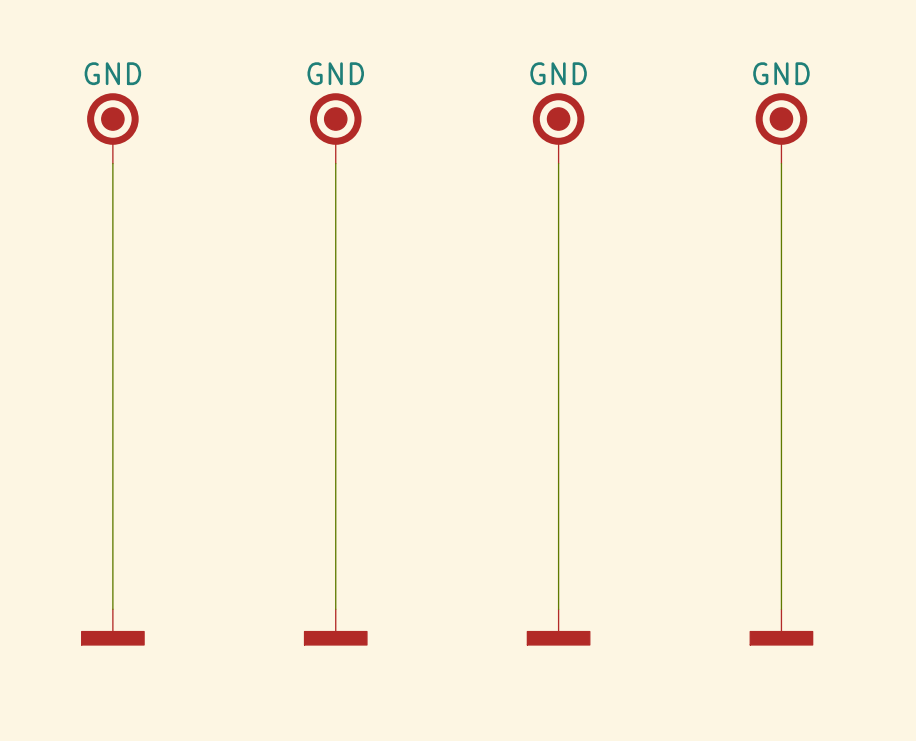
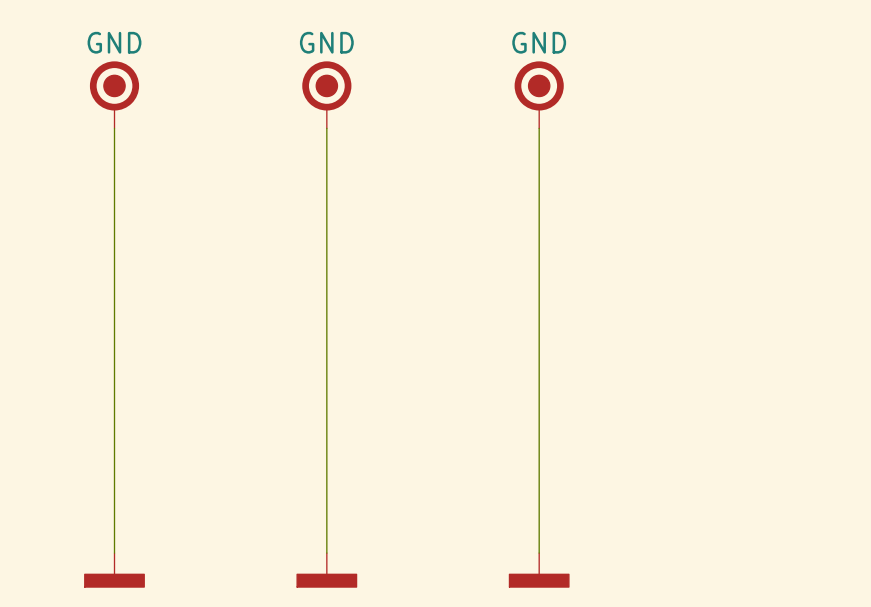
part: GND (781, 128) -> none
wire: (781, 163) (781, 609) -> none
power symbol: (781, 627) -> none

